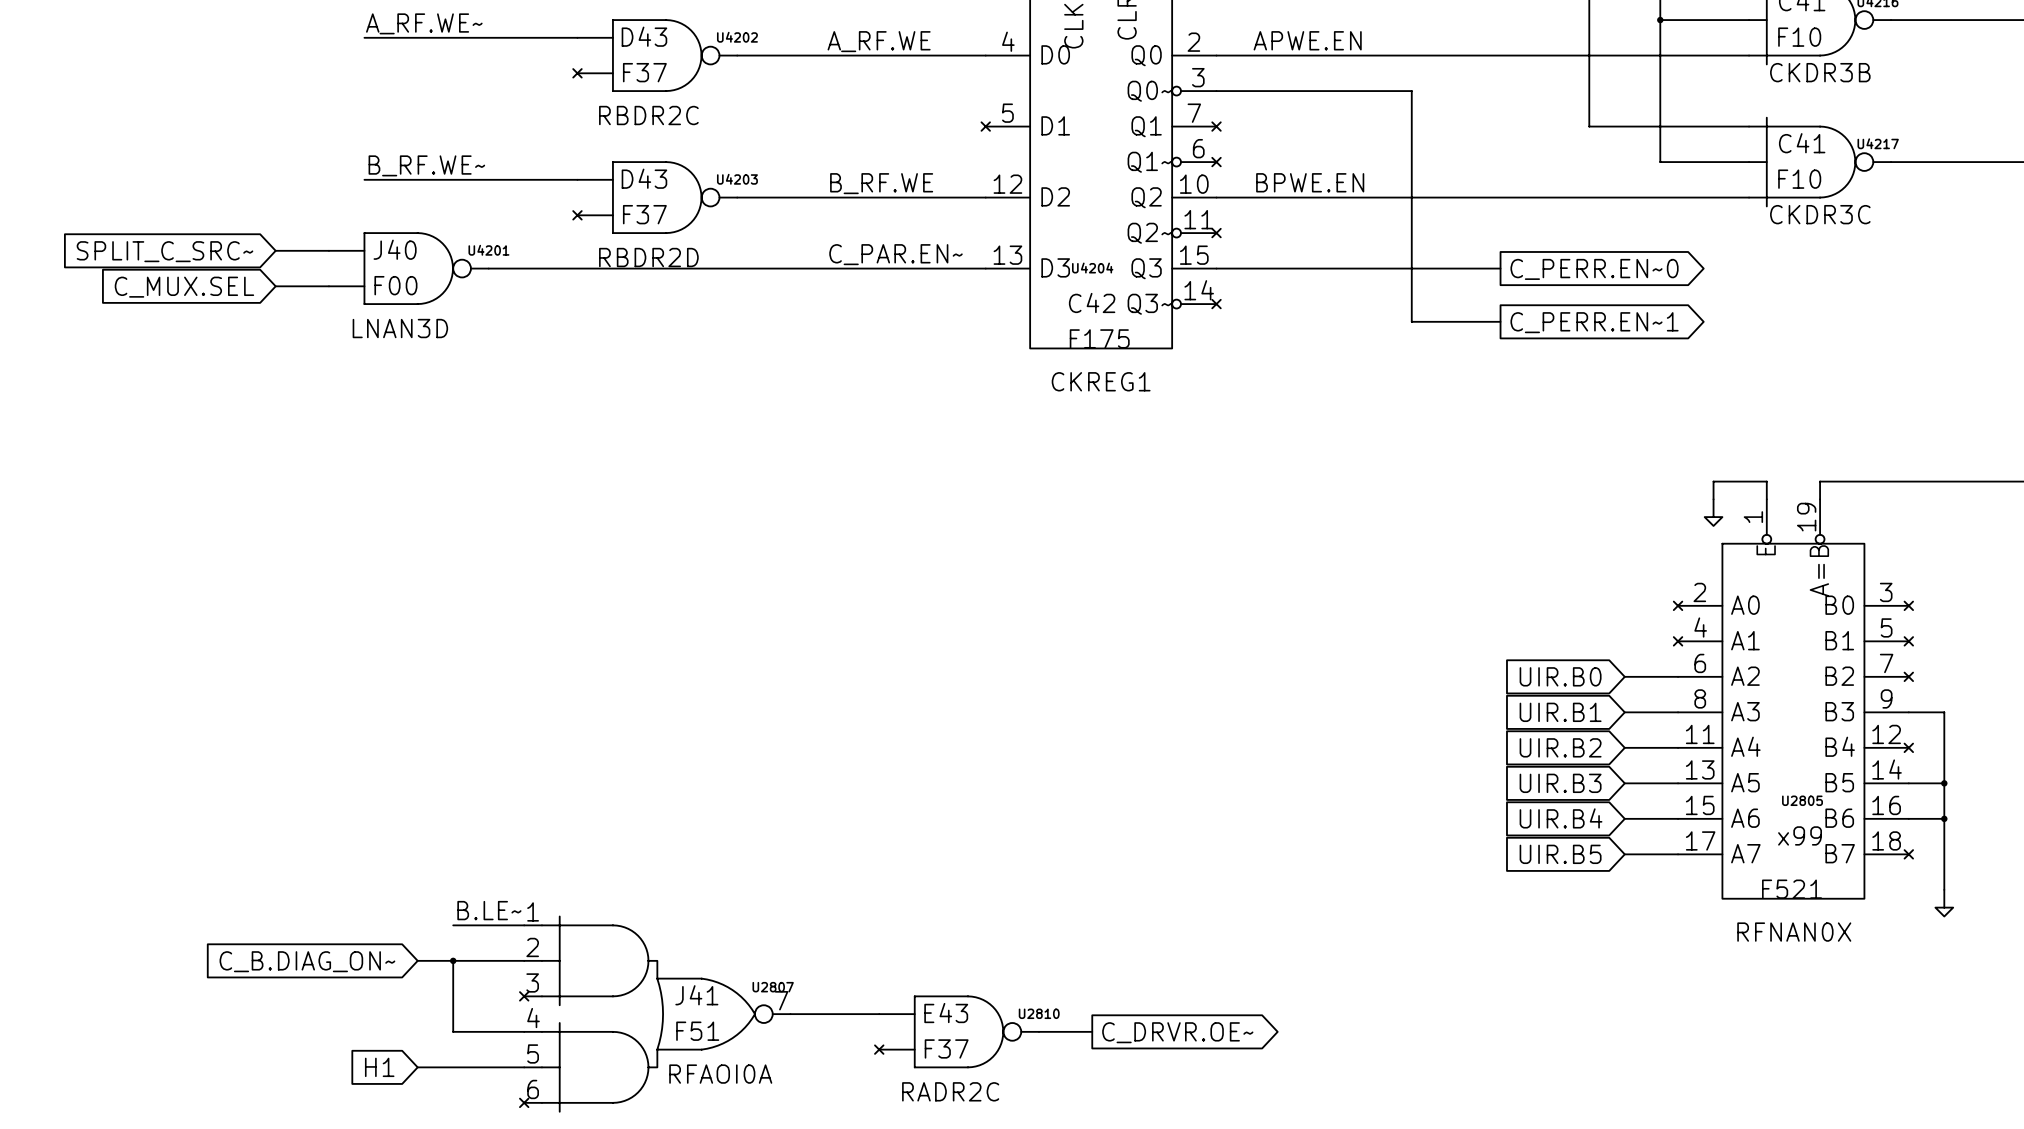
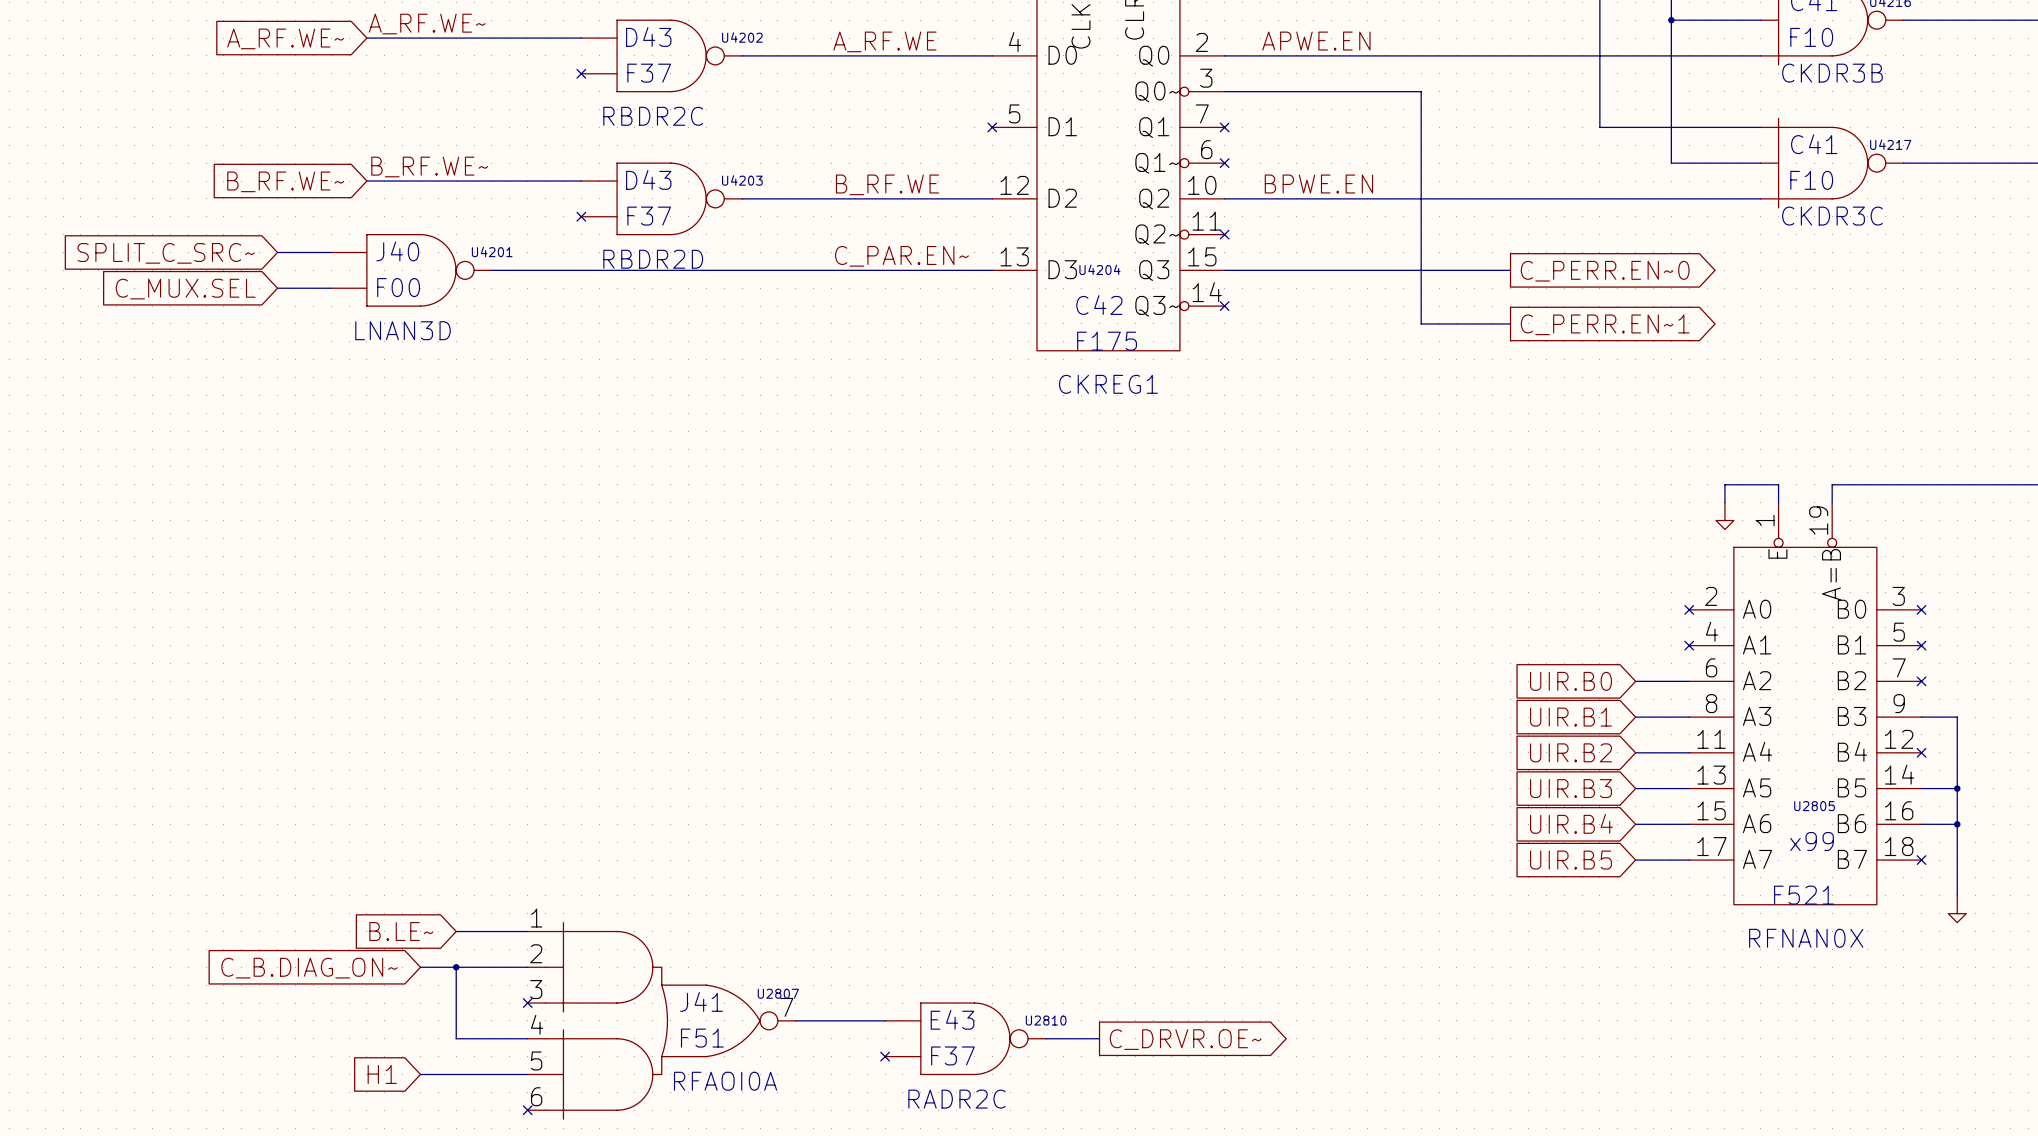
global label: none -> A_RF.WE~ (285, 38)
global label: none -> B_RF.WE~ (285, 181)
label: B.LE~ (489, 910) -> none
global label: none -> B.LE~ (401, 931)

